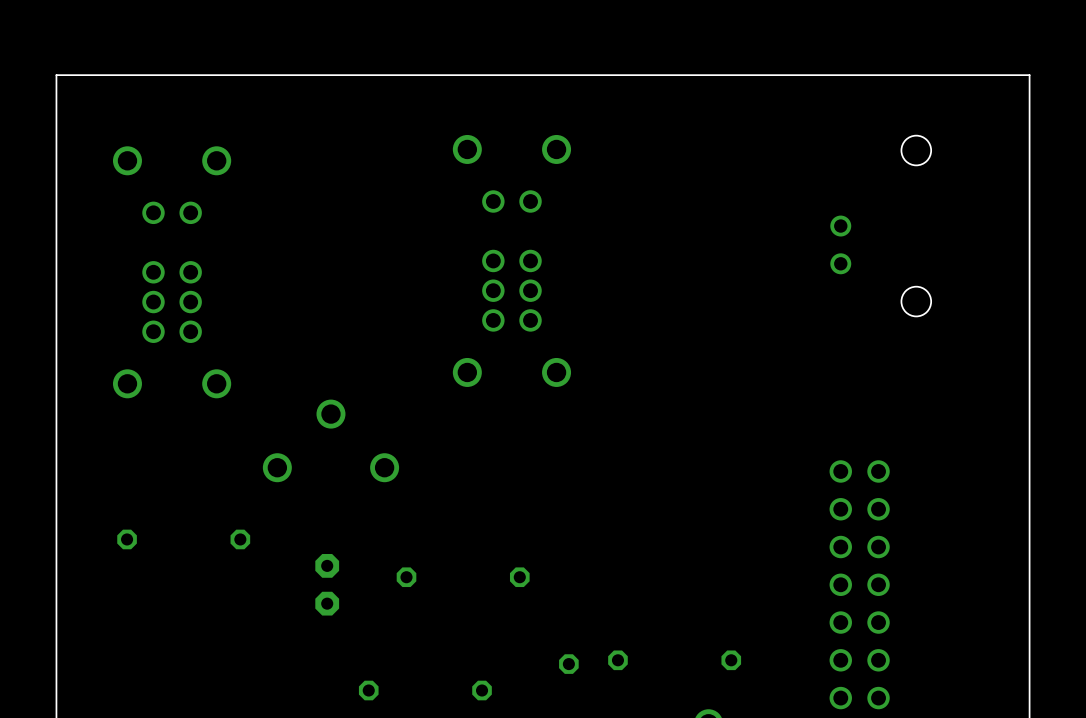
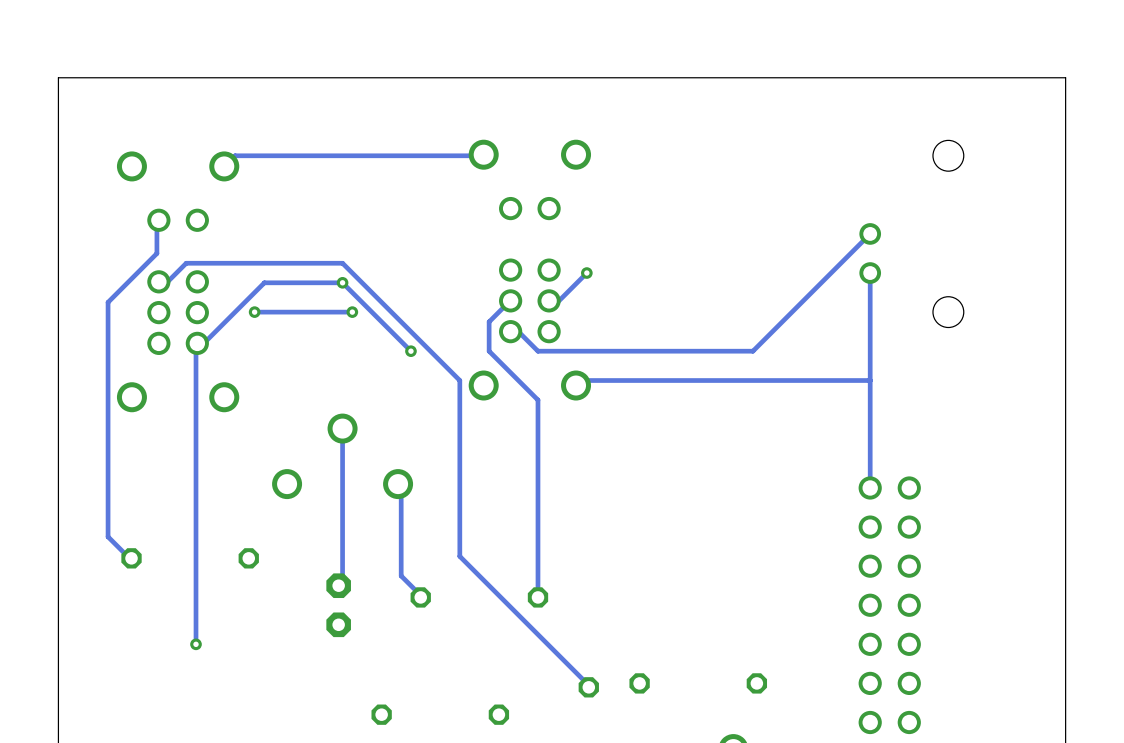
track: none -> (483, 154) (235, 155) (224, 166)
track: none -> (158, 220) (156, 224) (156, 253) (108, 302) (108, 536) (131, 558)
track: none -> (870, 233) (752, 351) (537, 351) (518, 331) (510, 331)
track: none -> (586, 273) (557, 302) (549, 300)
via: none -> (586, 273)
track: none -> (870, 273) (870, 487)
track: none -> (158, 281) (166, 282) (186, 263) (342, 263) (459, 380) (459, 556) (588, 687)
via: none -> (342, 282)
track: none -> (510, 300) (489, 321) (489, 351) (537, 400) (537, 597)
via: none -> (254, 312)
track: none -> (352, 312) (254, 312)
via: none -> (352, 312)
track: none -> (410, 351) (342, 282) (264, 282) (205, 341) (197, 343) (196, 644)
via: none -> (410, 351)
track: none -> (870, 380) (577, 380) (576, 385)
track: none -> (342, 428) (342, 585) (338, 585)
track: none -> (398, 484) (401, 487) (401, 575) (420, 597)
via: none -> (196, 644)

